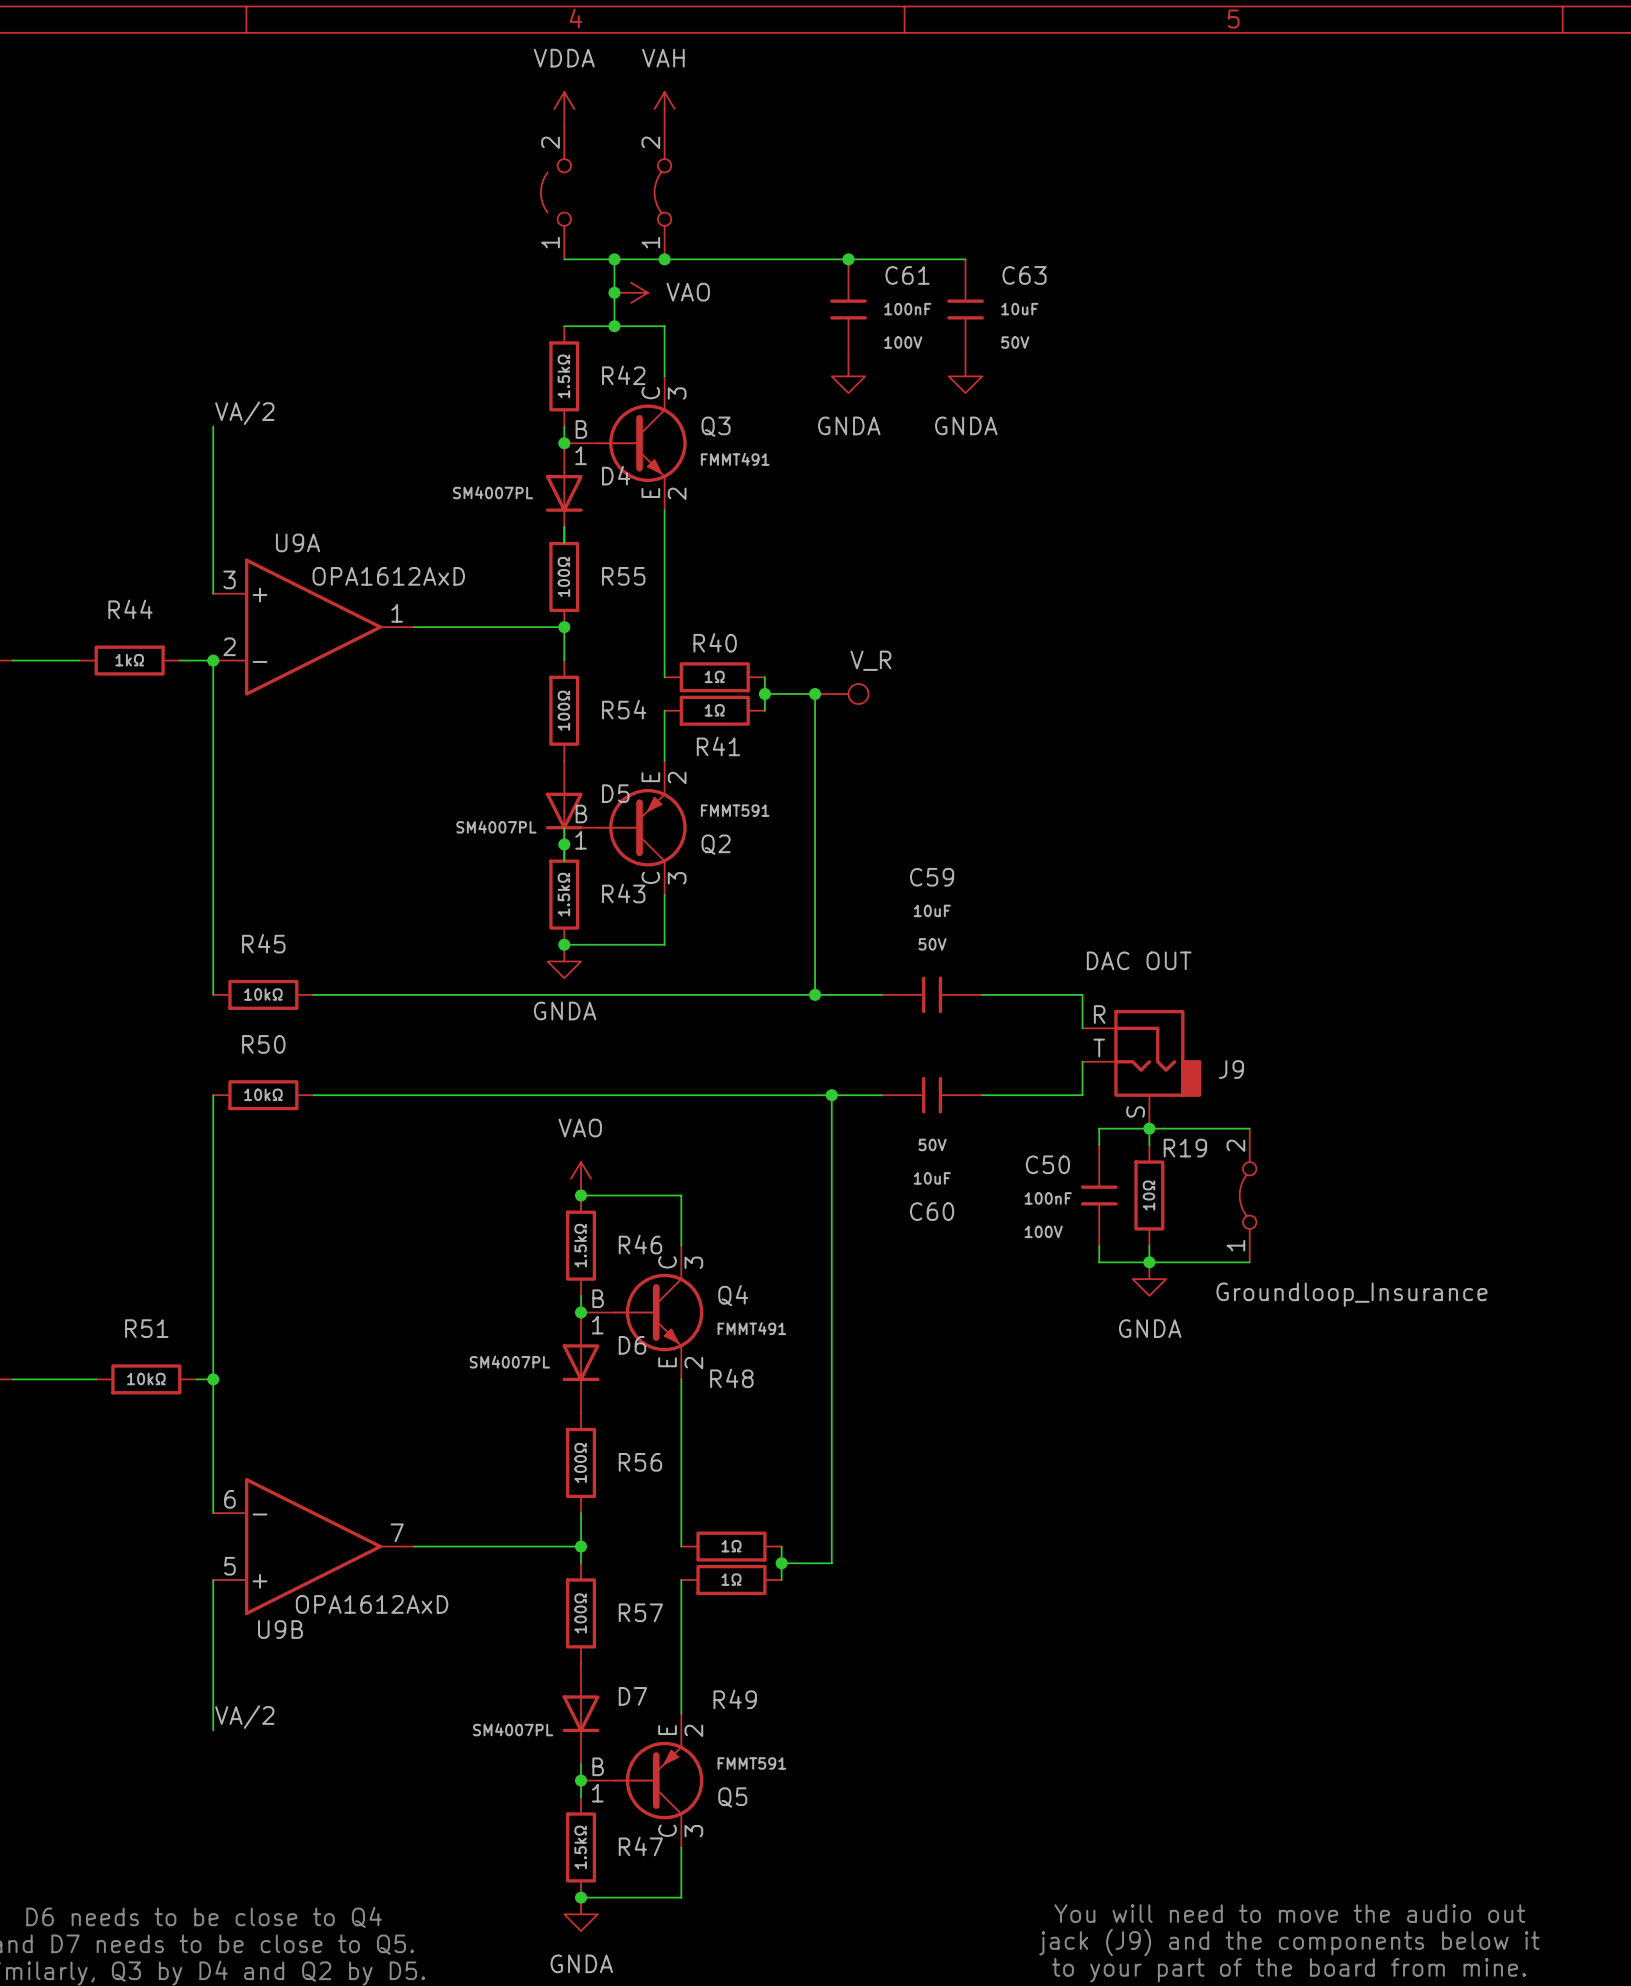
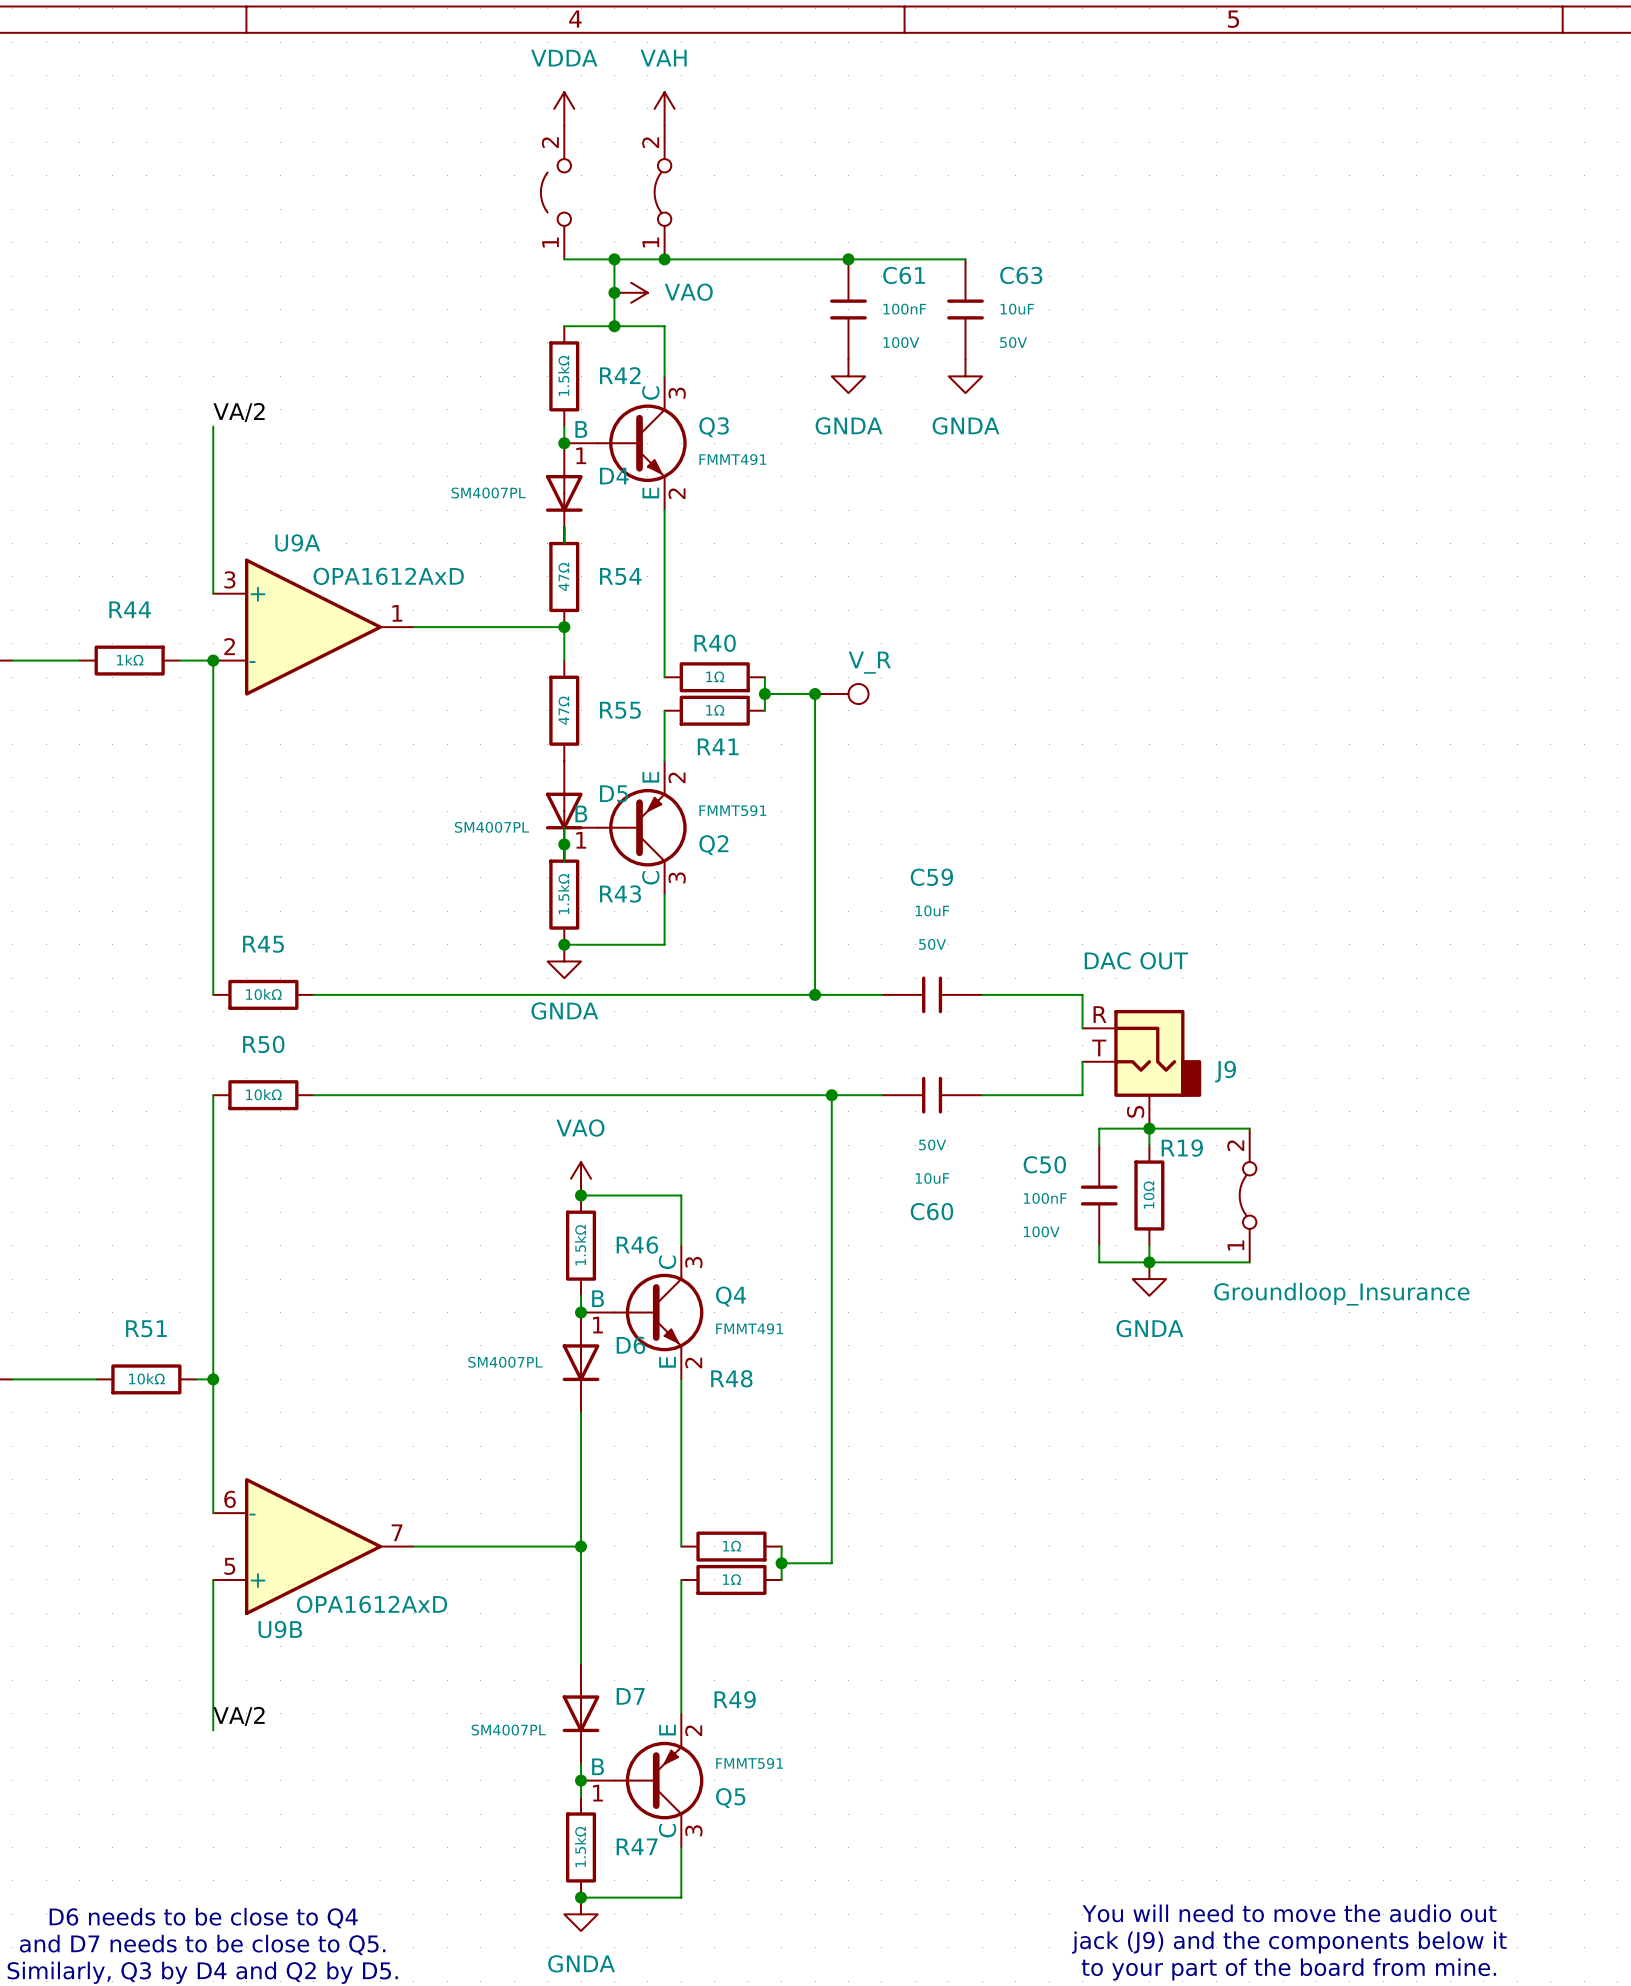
R55 value: 100Ω (563, 576) -> 47Ω (563, 576)
R55 name: R55 (623, 576) -> R54 (620, 576)
R54 name: R54 (624, 709) -> R55 (620, 710)
R54 value: 100Ω (563, 710) -> 47Ω (563, 710)
wire: none -> (581, 1412) (581, 1513)
R56: 100Ω (581, 1462) -> none
wire: none -> (581, 1563) (581, 1663)
R57: 100Ω (581, 1613) -> none

